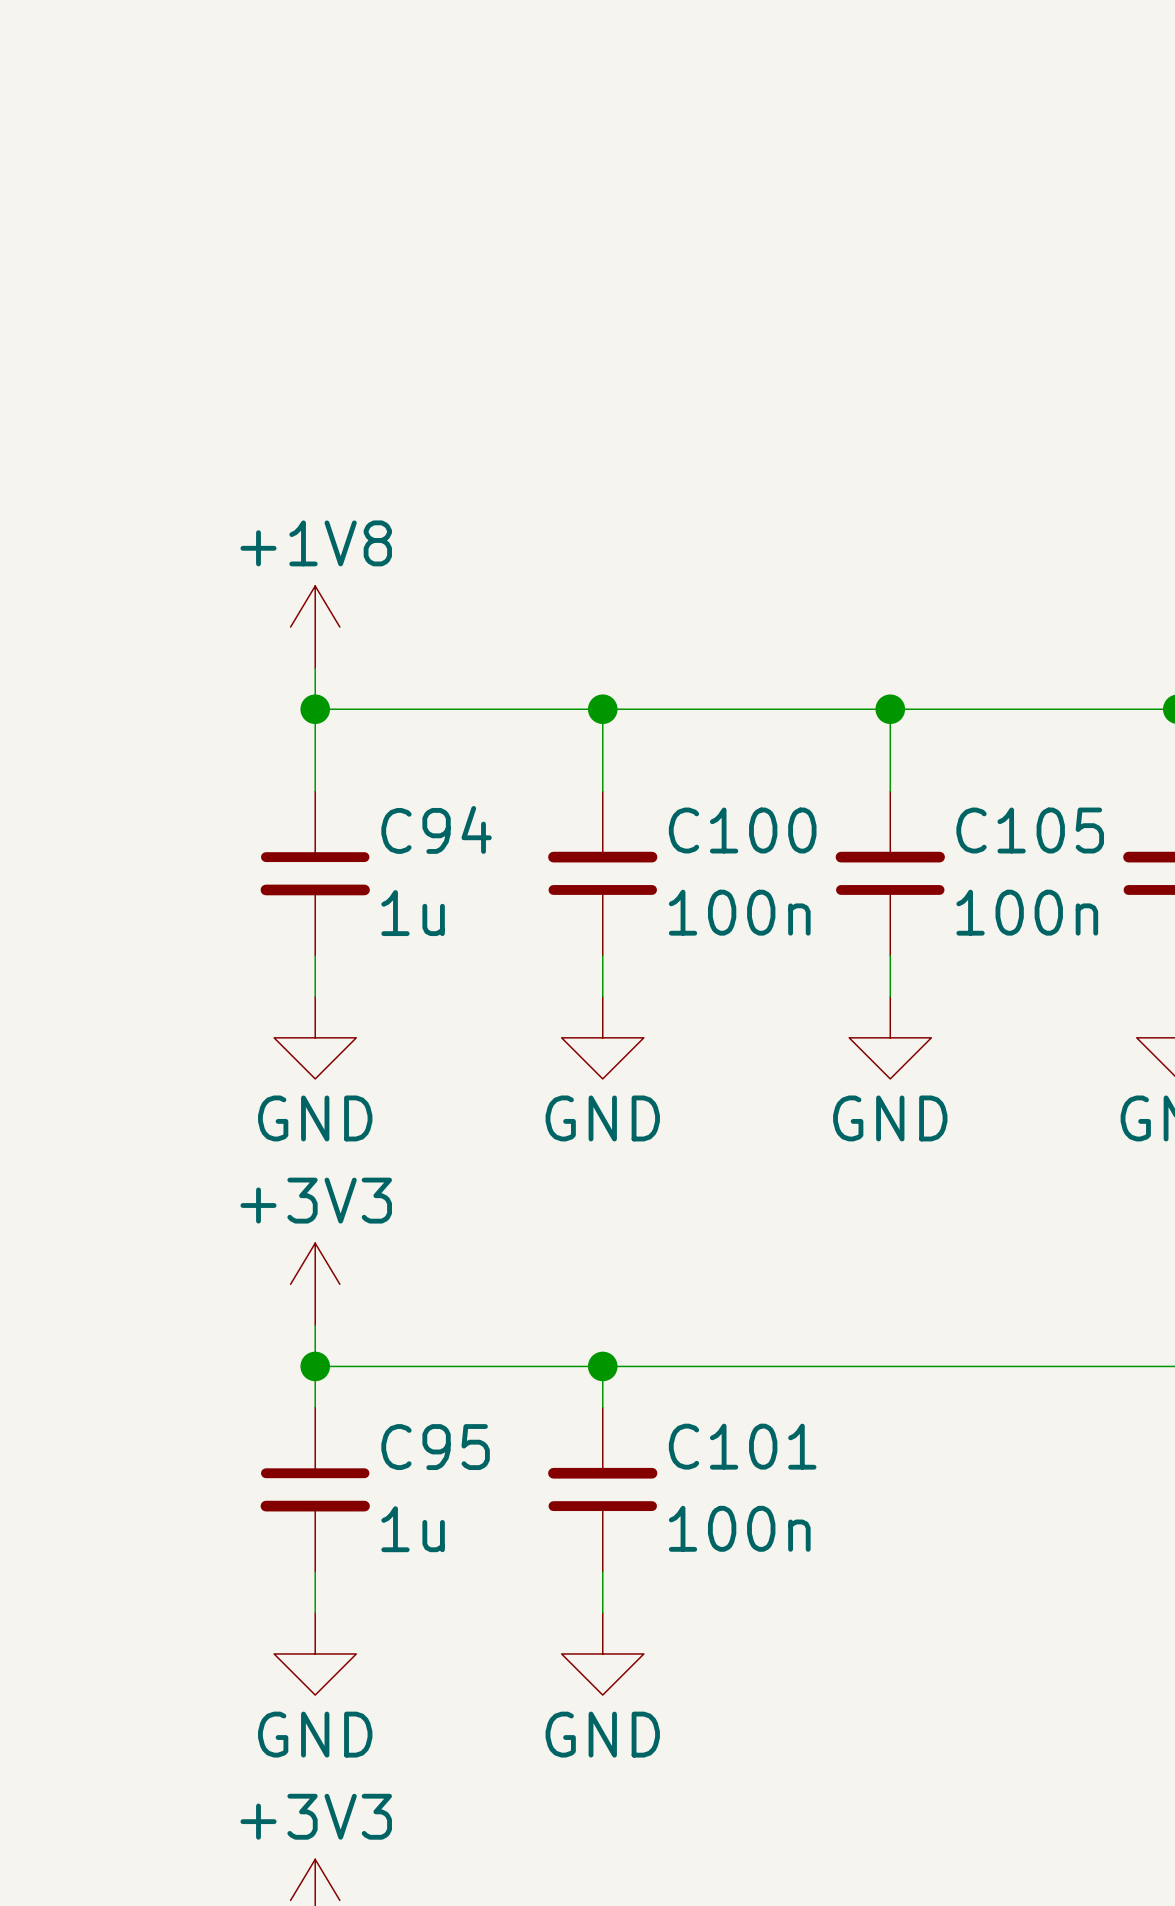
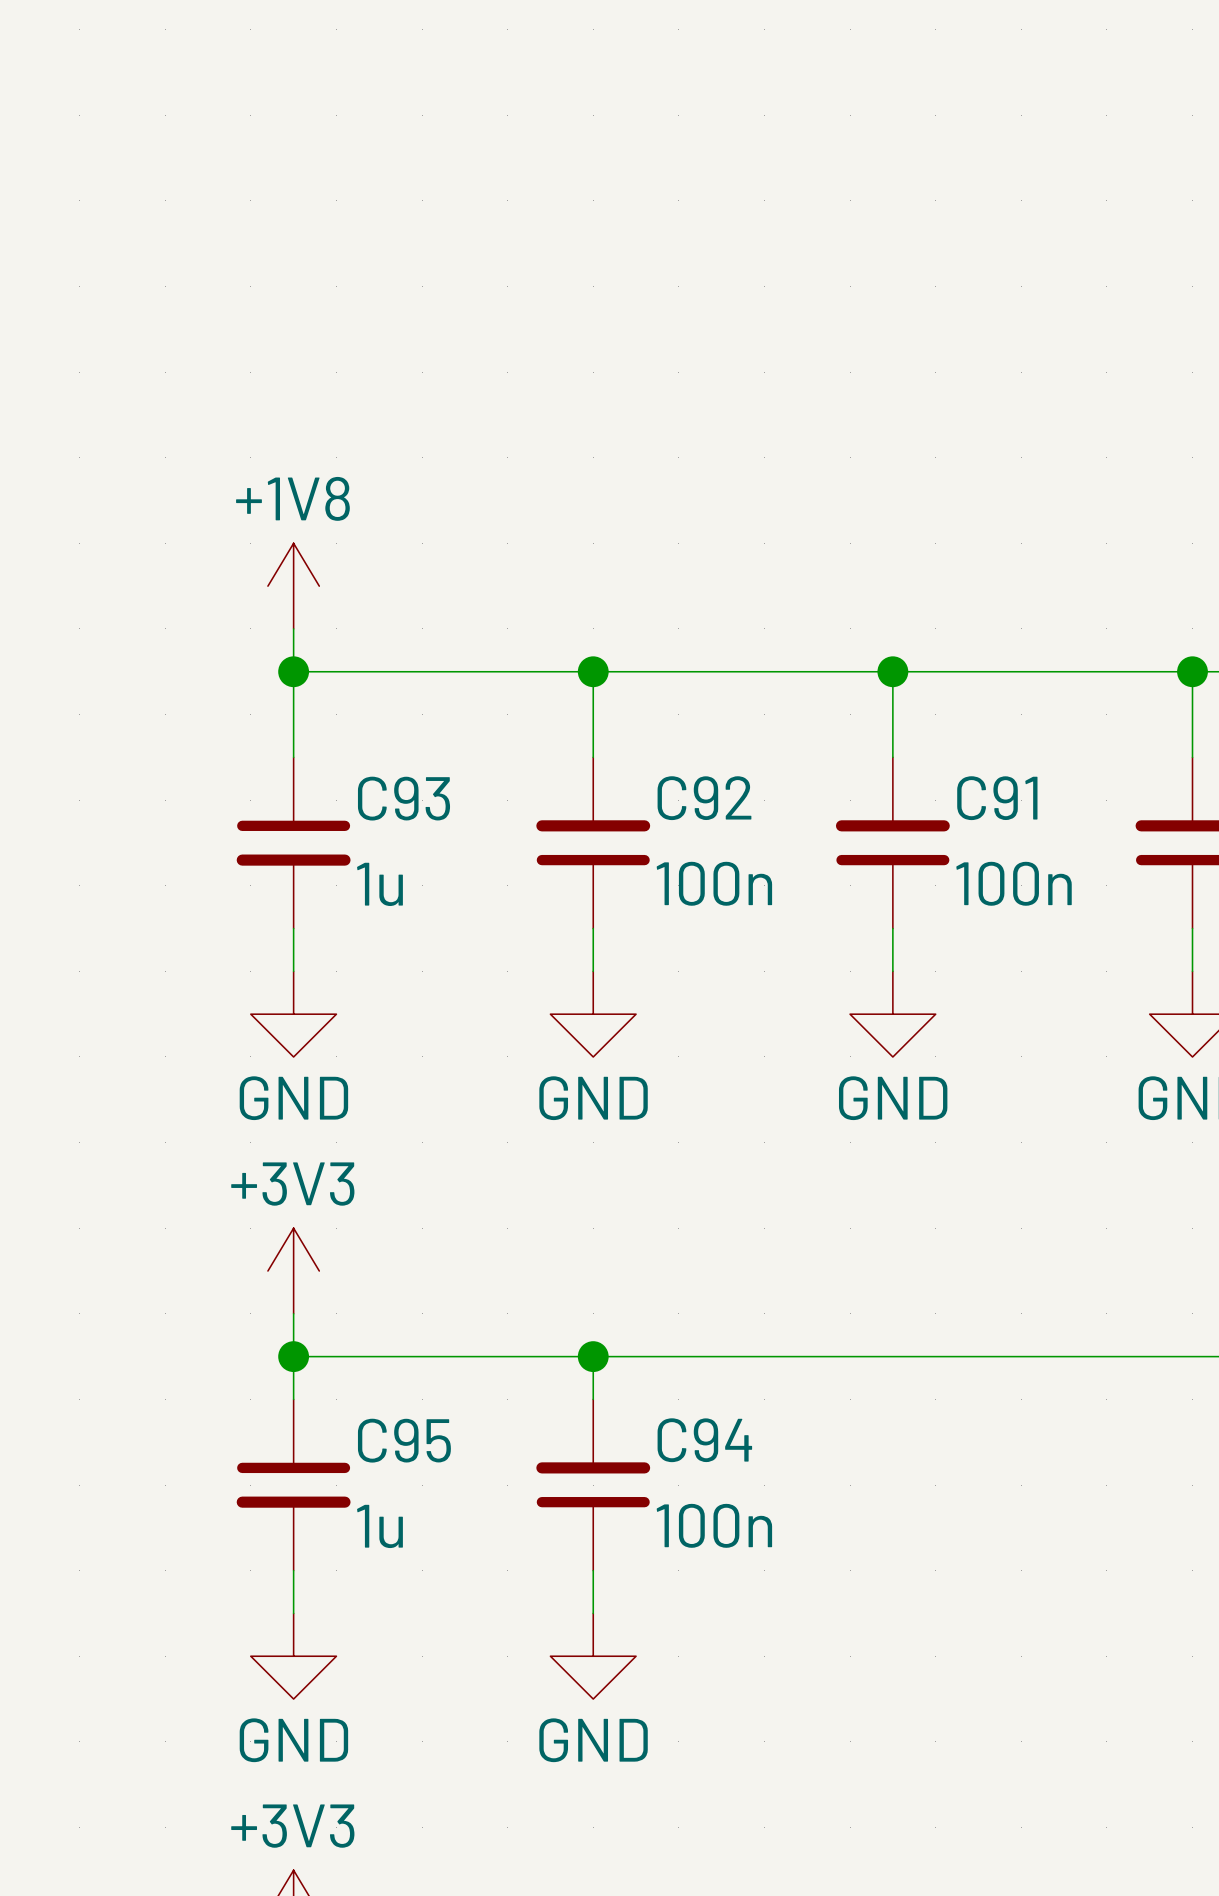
C94 name: C94 (436, 829) -> C93 (403, 798)
C100 name: C100 (742, 830) -> C92 (704, 798)
C105 name: C105 (1030, 830) -> C91 (997, 798)
C101 name: C101 (742, 1446) -> C94 (704, 1440)

